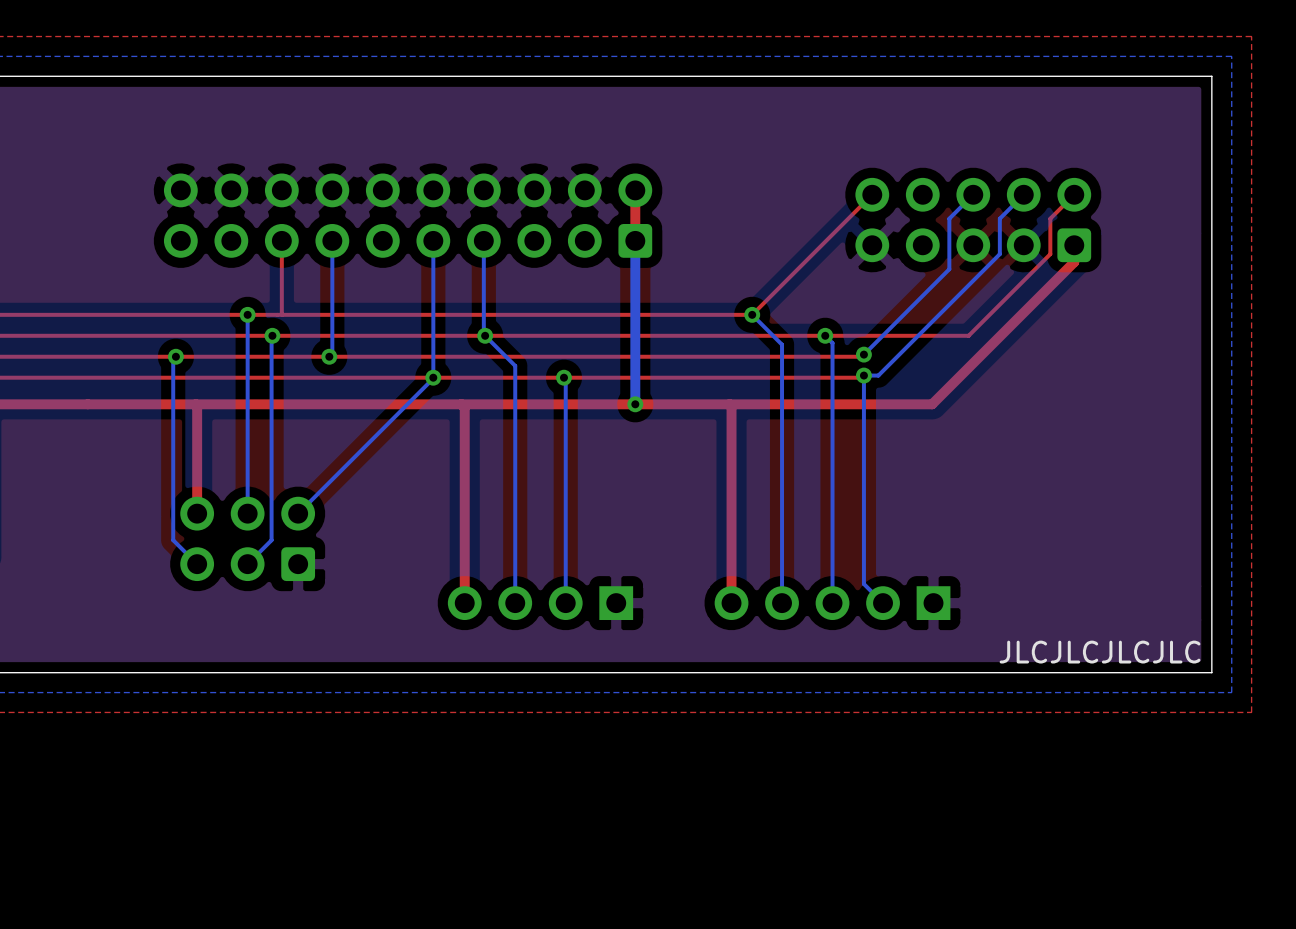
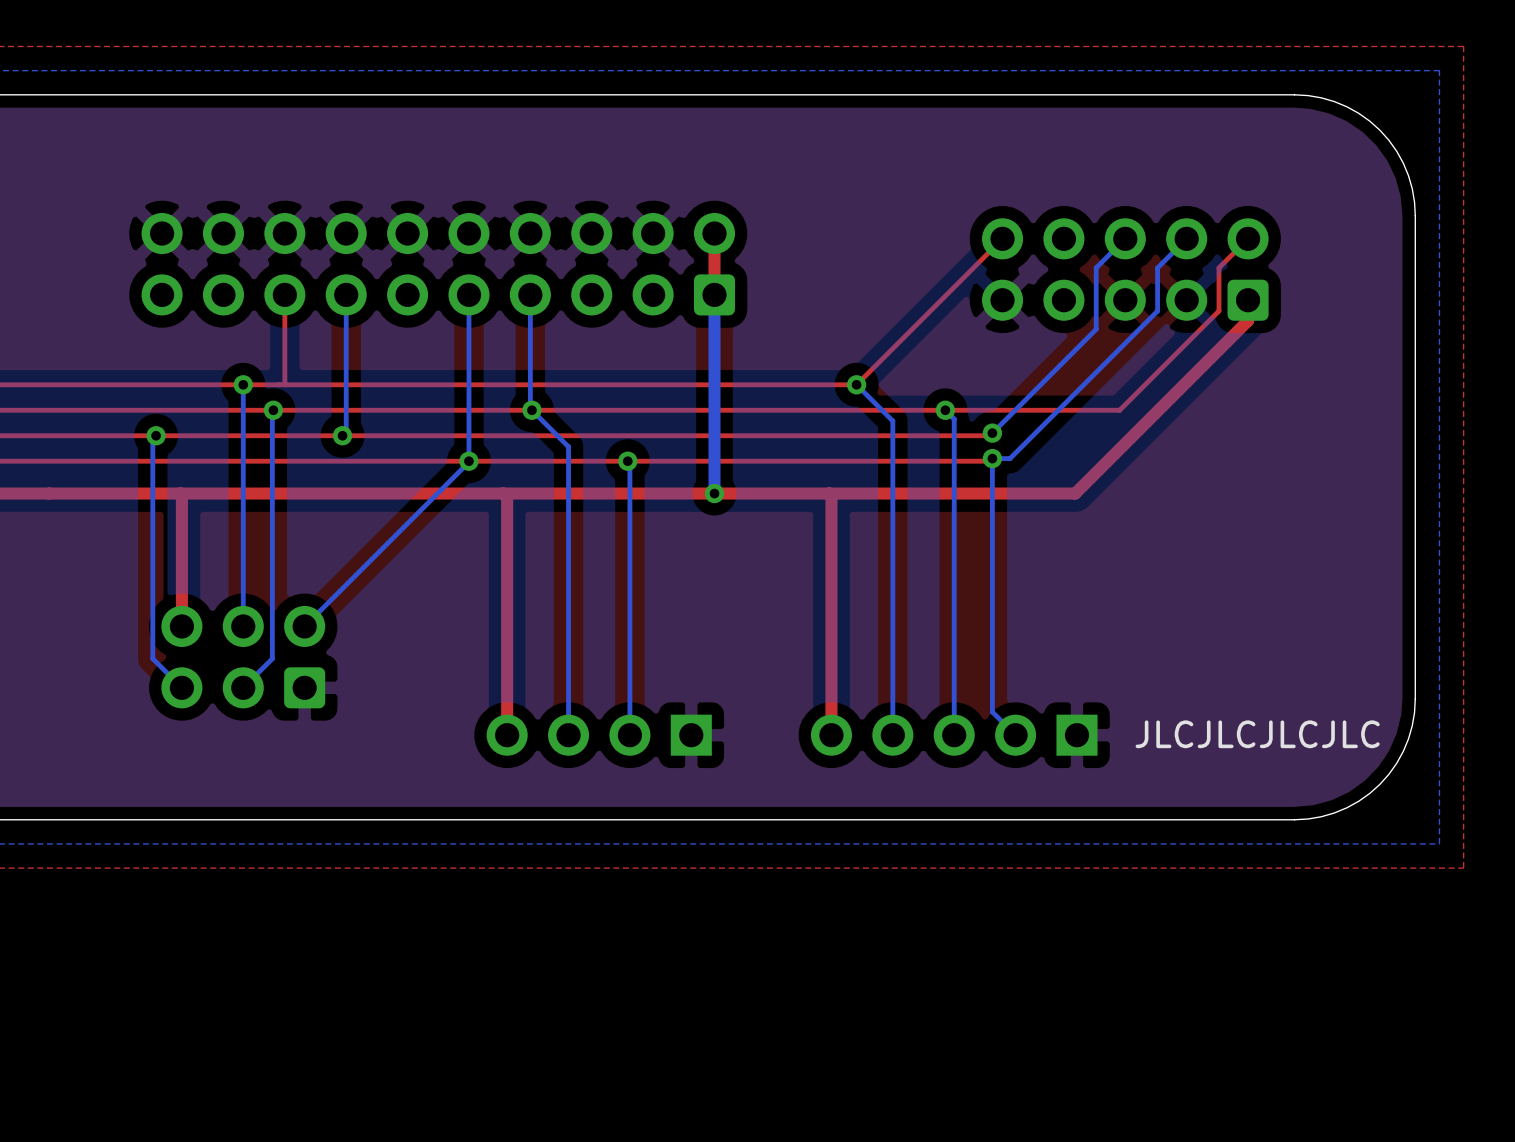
board edge: (1112, 76) (1211, 76) (1211, 175) -> (1294, 94) (1321, 97) (1346, 106) (1369, 121) (1379, 130) (1396, 151) (1408, 175) (1414, 202) (1415, 215)
board edge: (1211, 573) (1211, 672) (1112, 672) -> (1415, 698) (1414, 712) (1408, 738) (1396, 763) (1379, 784) (1358, 801) (1334, 812) (1308, 819) (1294, 819)
text position: JLCJLCJLCJLC (1100, 652) -> JLCJLCJLCJLC (1257, 734)

